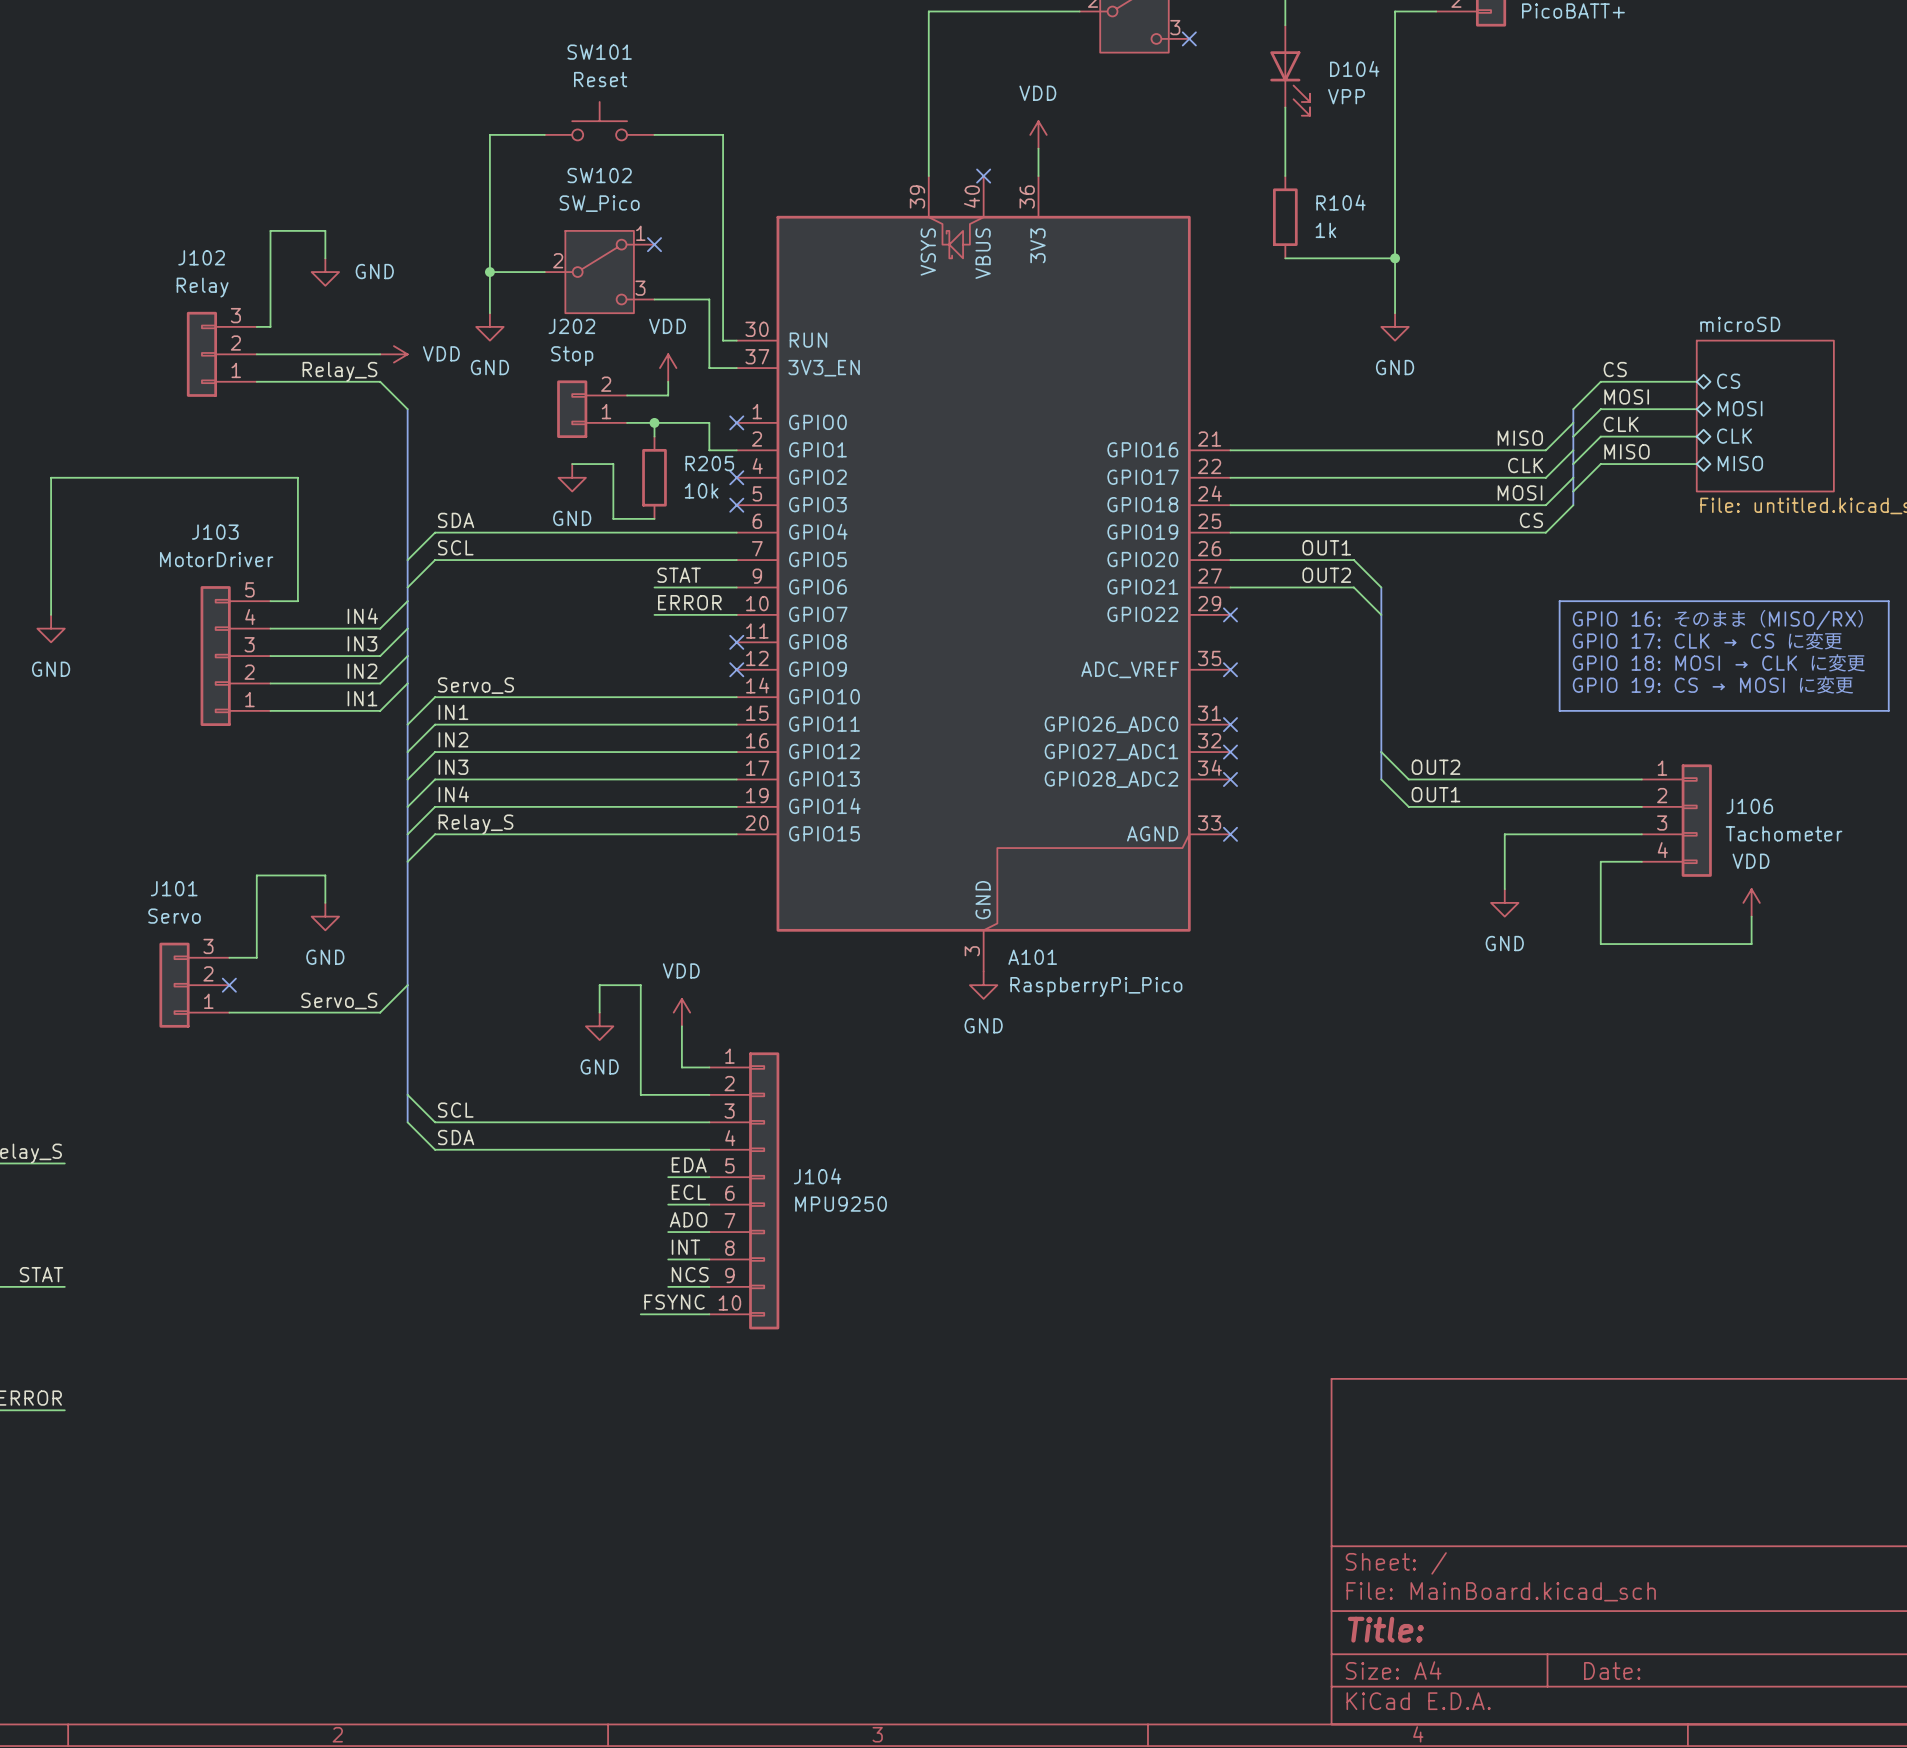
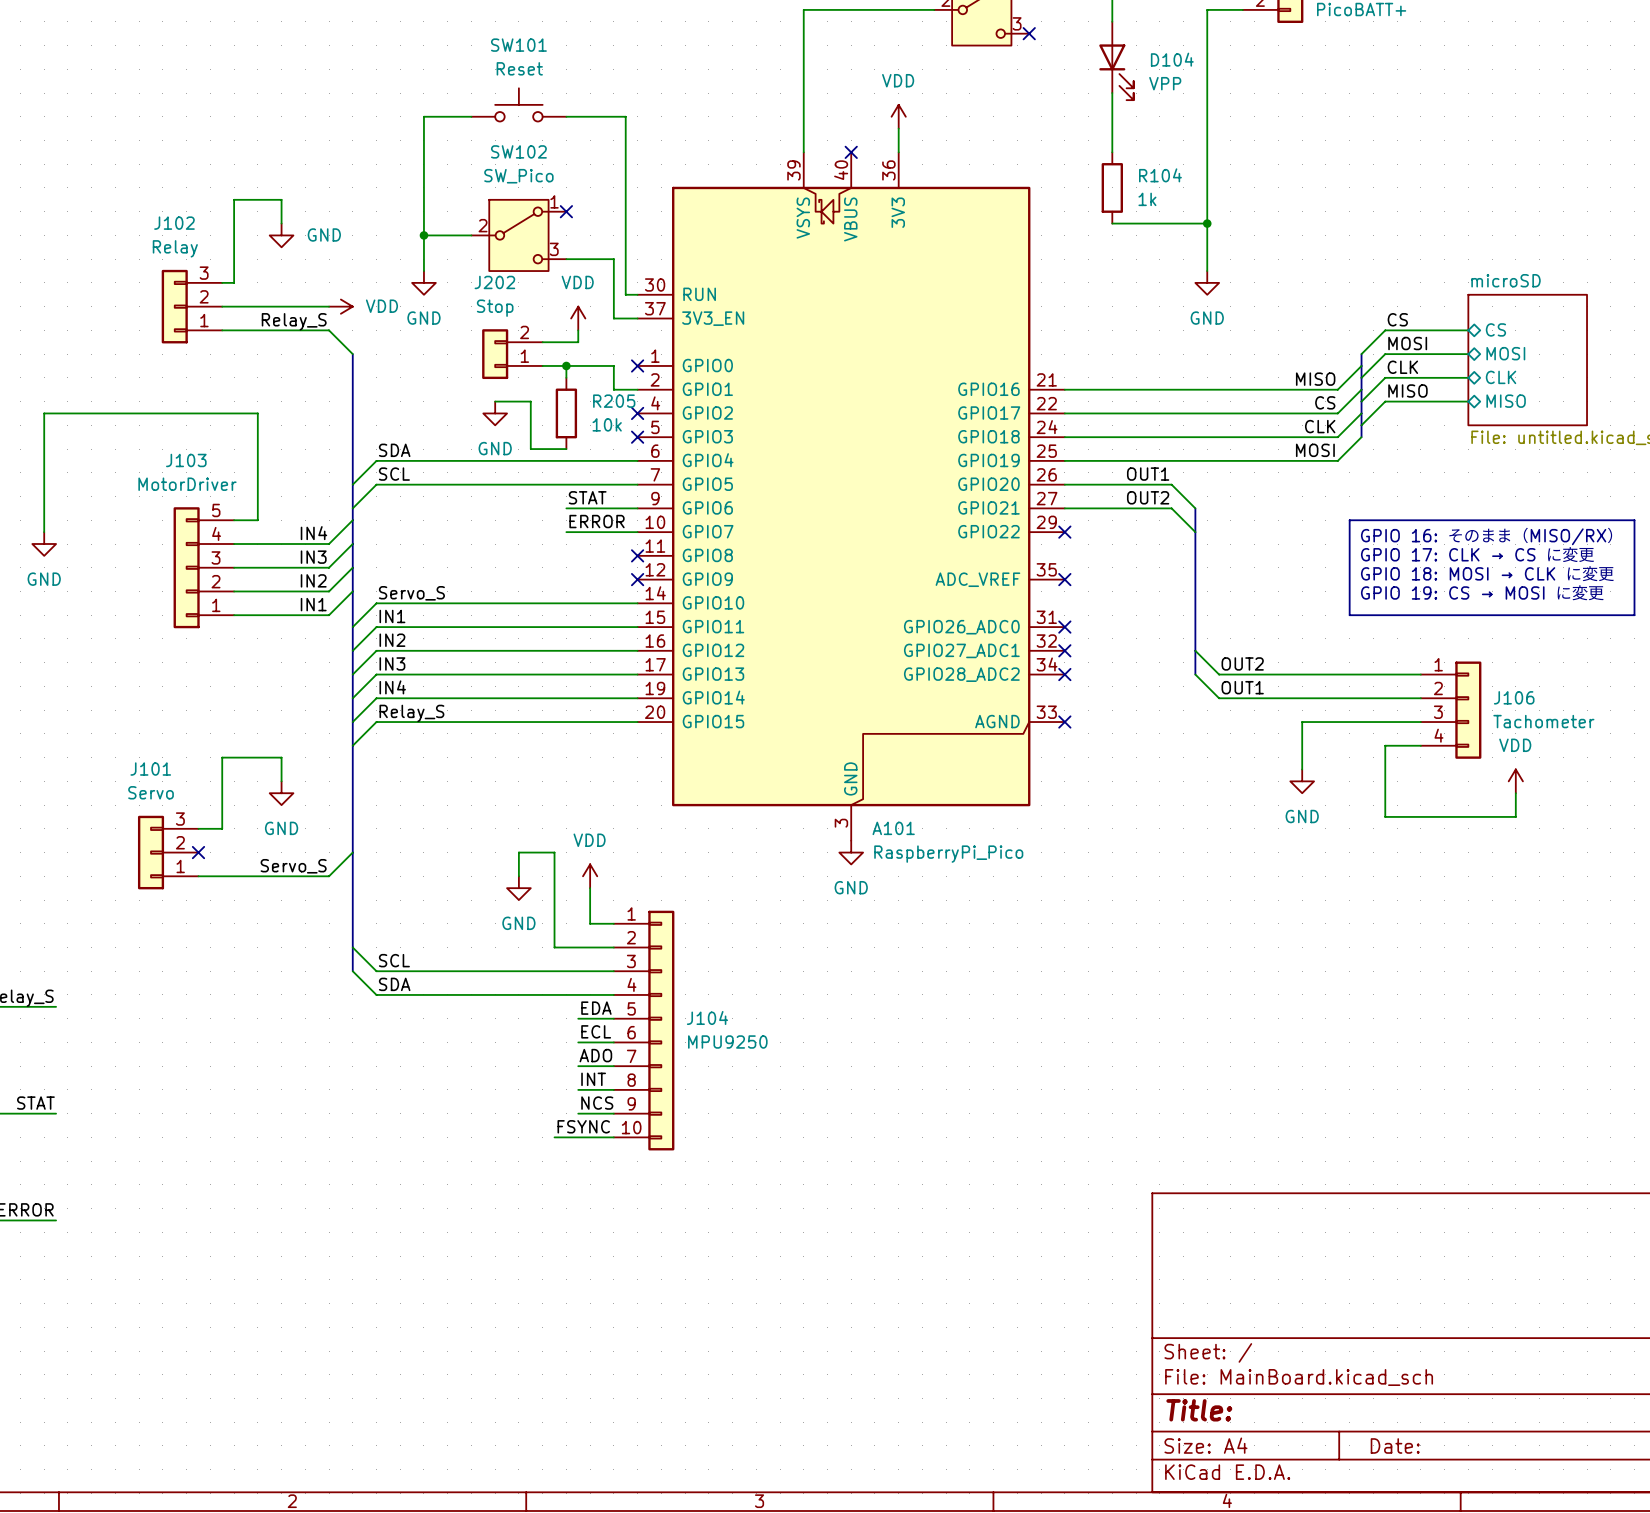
label: CLK (1525, 465) -> CS (1325, 402)
label: MOSI (1520, 492) -> CLK (1320, 426)
label: CS (1531, 520) -> MOSI (1315, 450)

